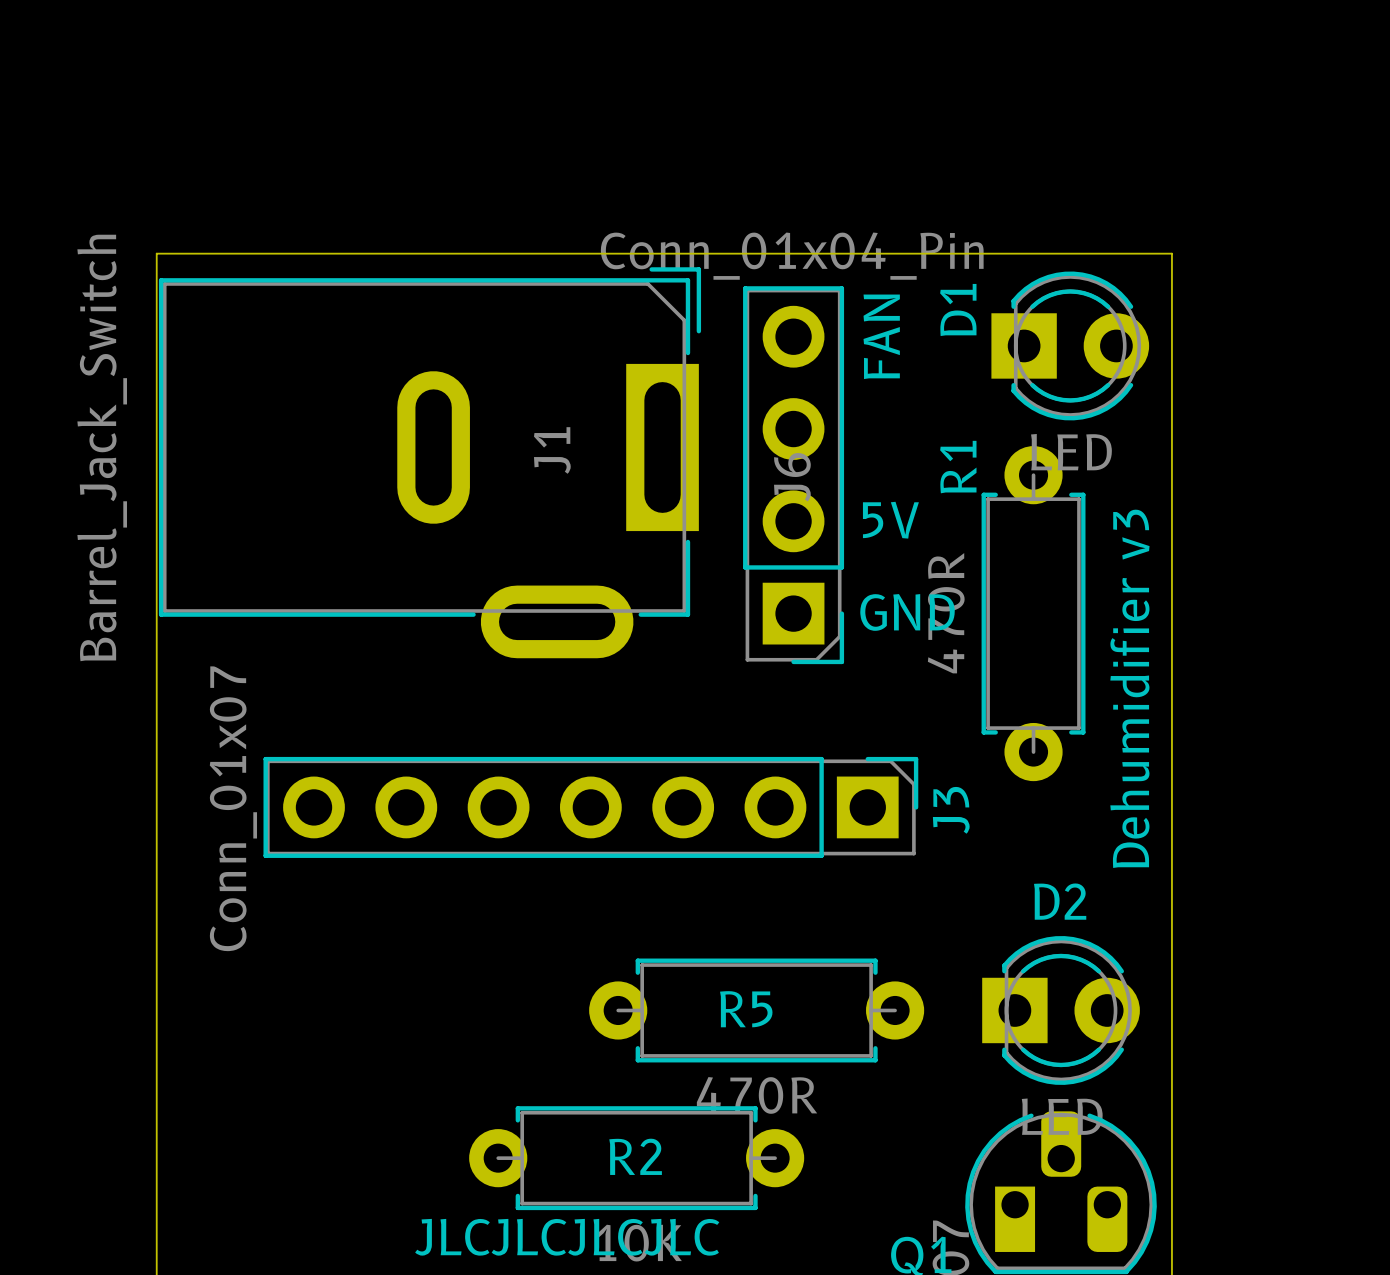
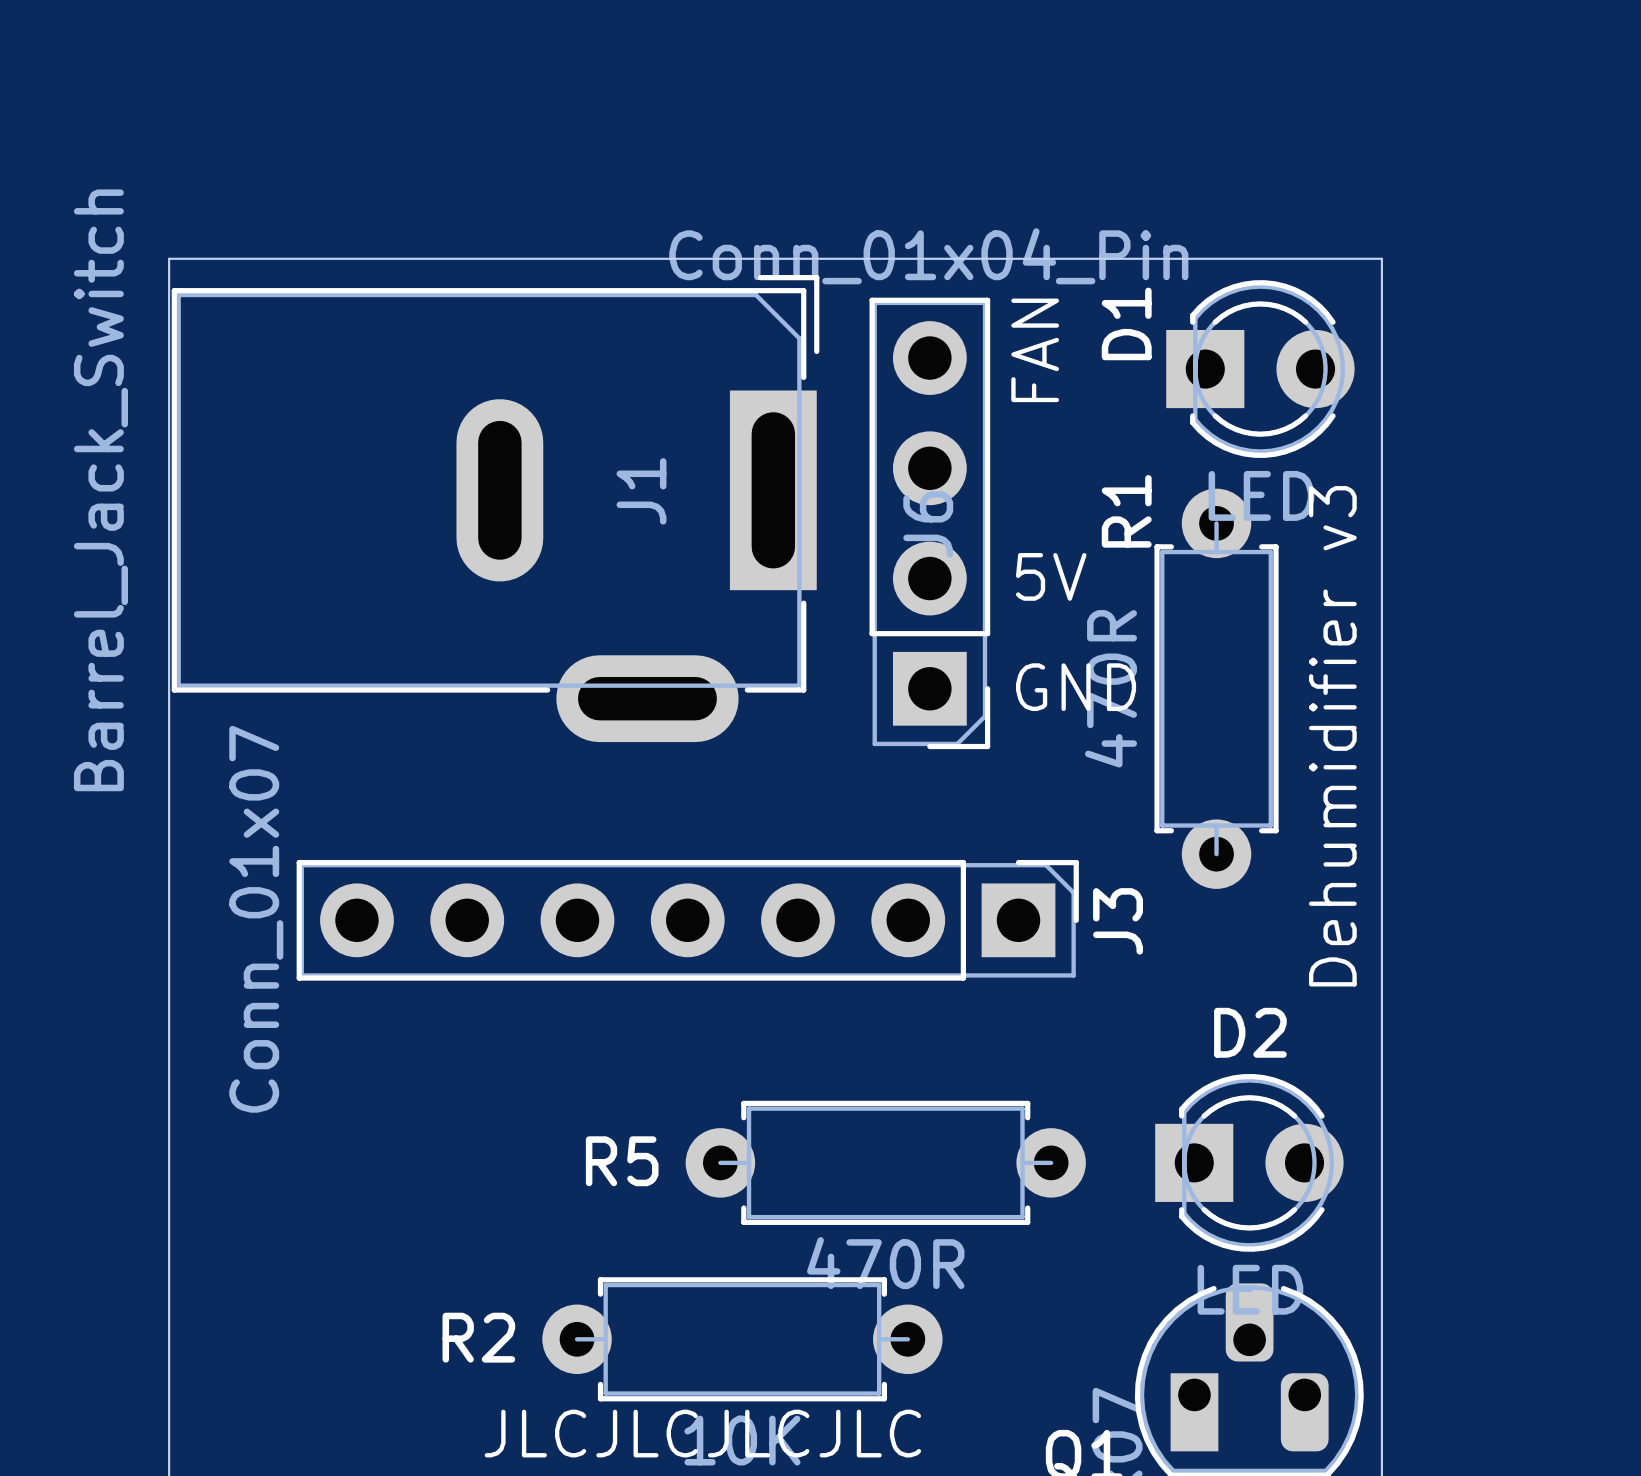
R5 name position: R5 (746, 1009) -> R5 (622, 1161)
R2 name position: R2 (635, 1156) -> R2 (478, 1337)

